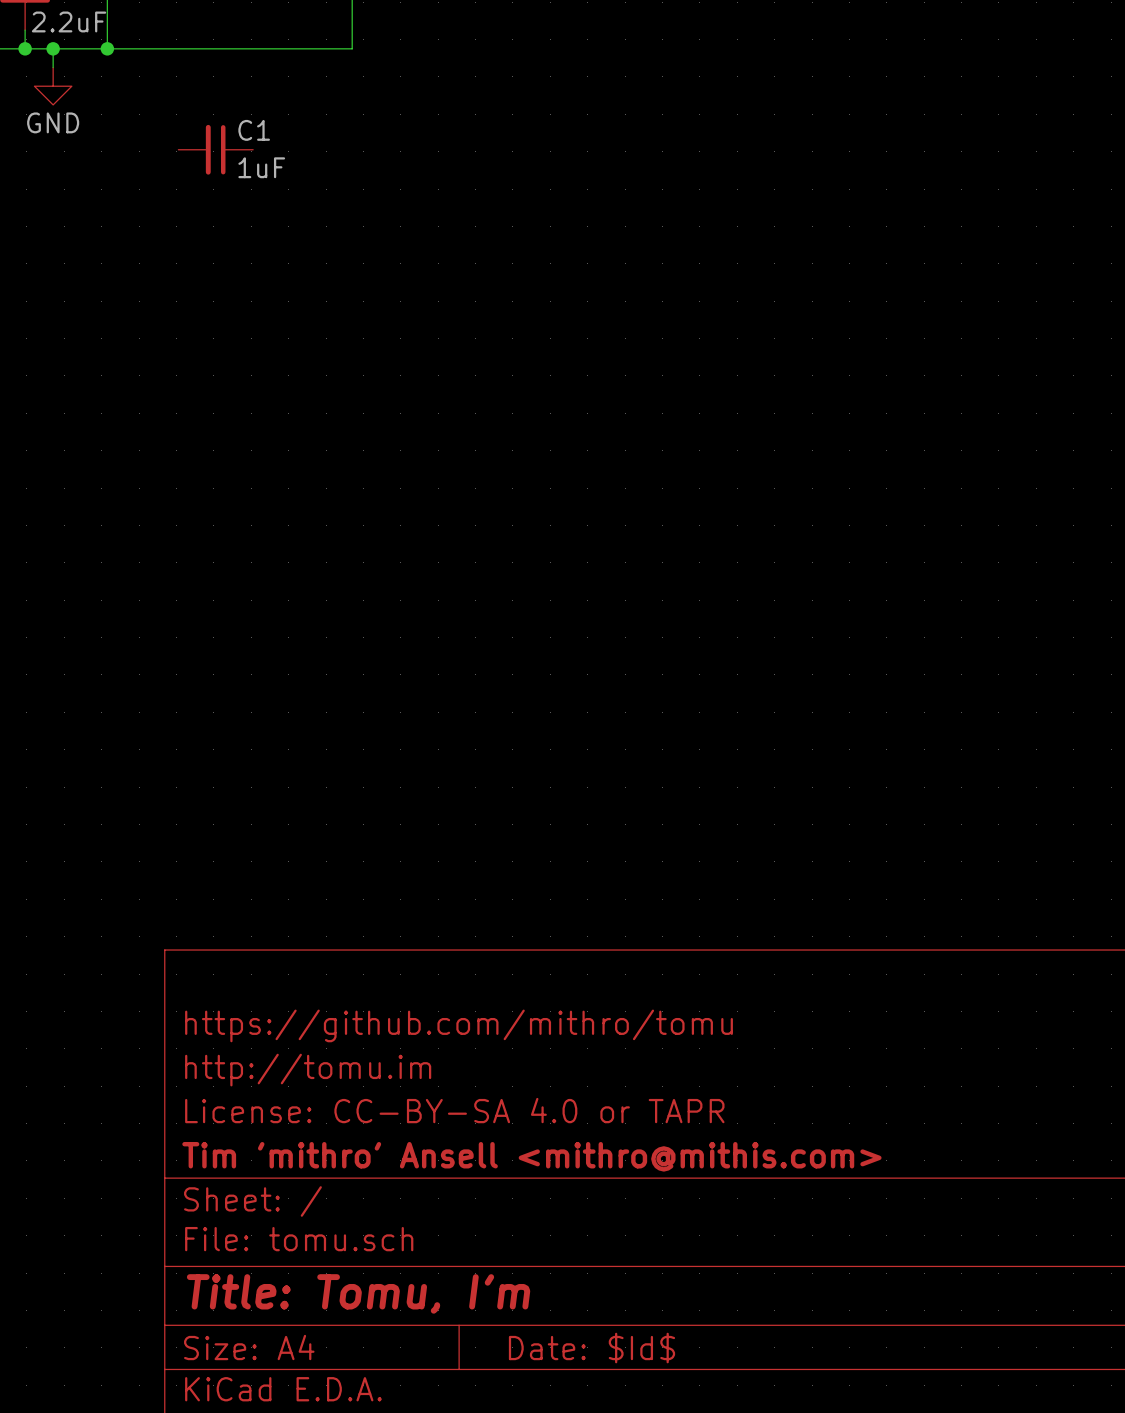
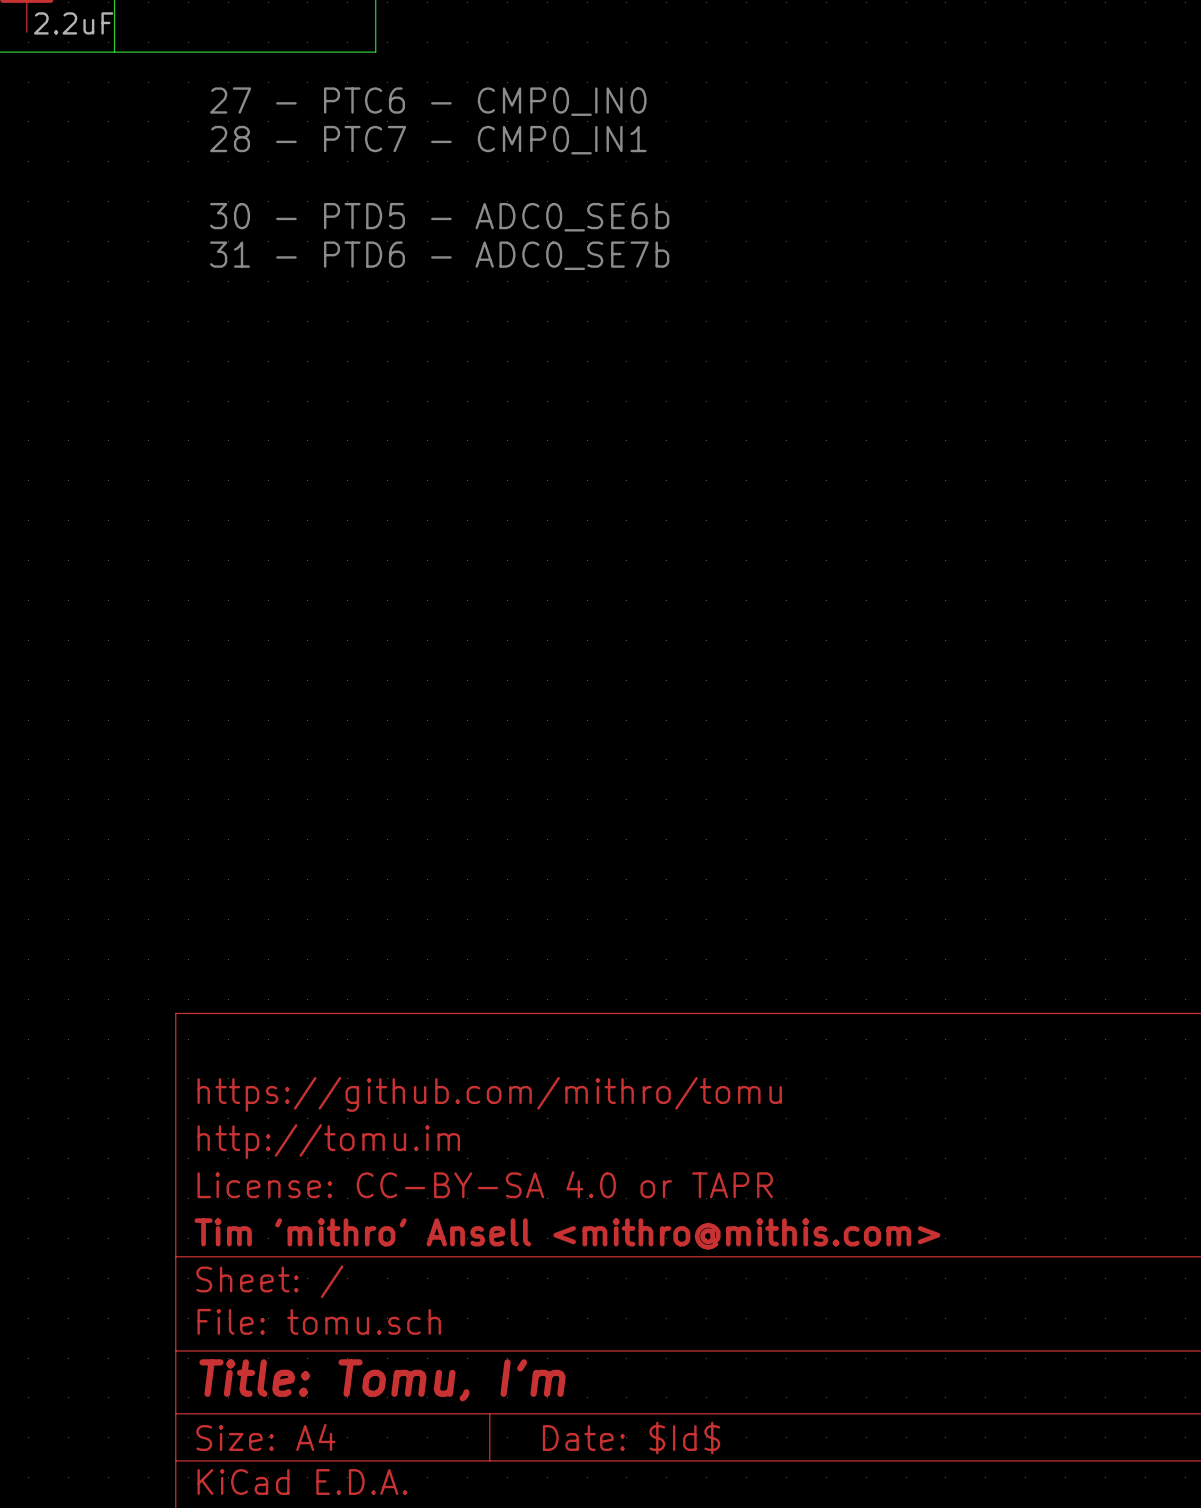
wire: (25, 30) (25, 48) -> none
junction: (25, 48) -> none
wire: (53, 48) (53, 67) -> none
junction: (53, 48) -> none
junction: (107, 48) -> none
power symbol: GND (53, 86) -> none
text: none -> 27 - PTC6 - CMP0_IN0 (428, 101)
text: none -> 28 - PTC7 - CMP0_IN1 (428, 140)
C1: 1uF (215, 149) -> none
text: none -> 30 - PTD5 - ADC0_SE6b (439, 217)
text: none -> 31 - PTD6 - ADC0_SE7b (439, 255)

